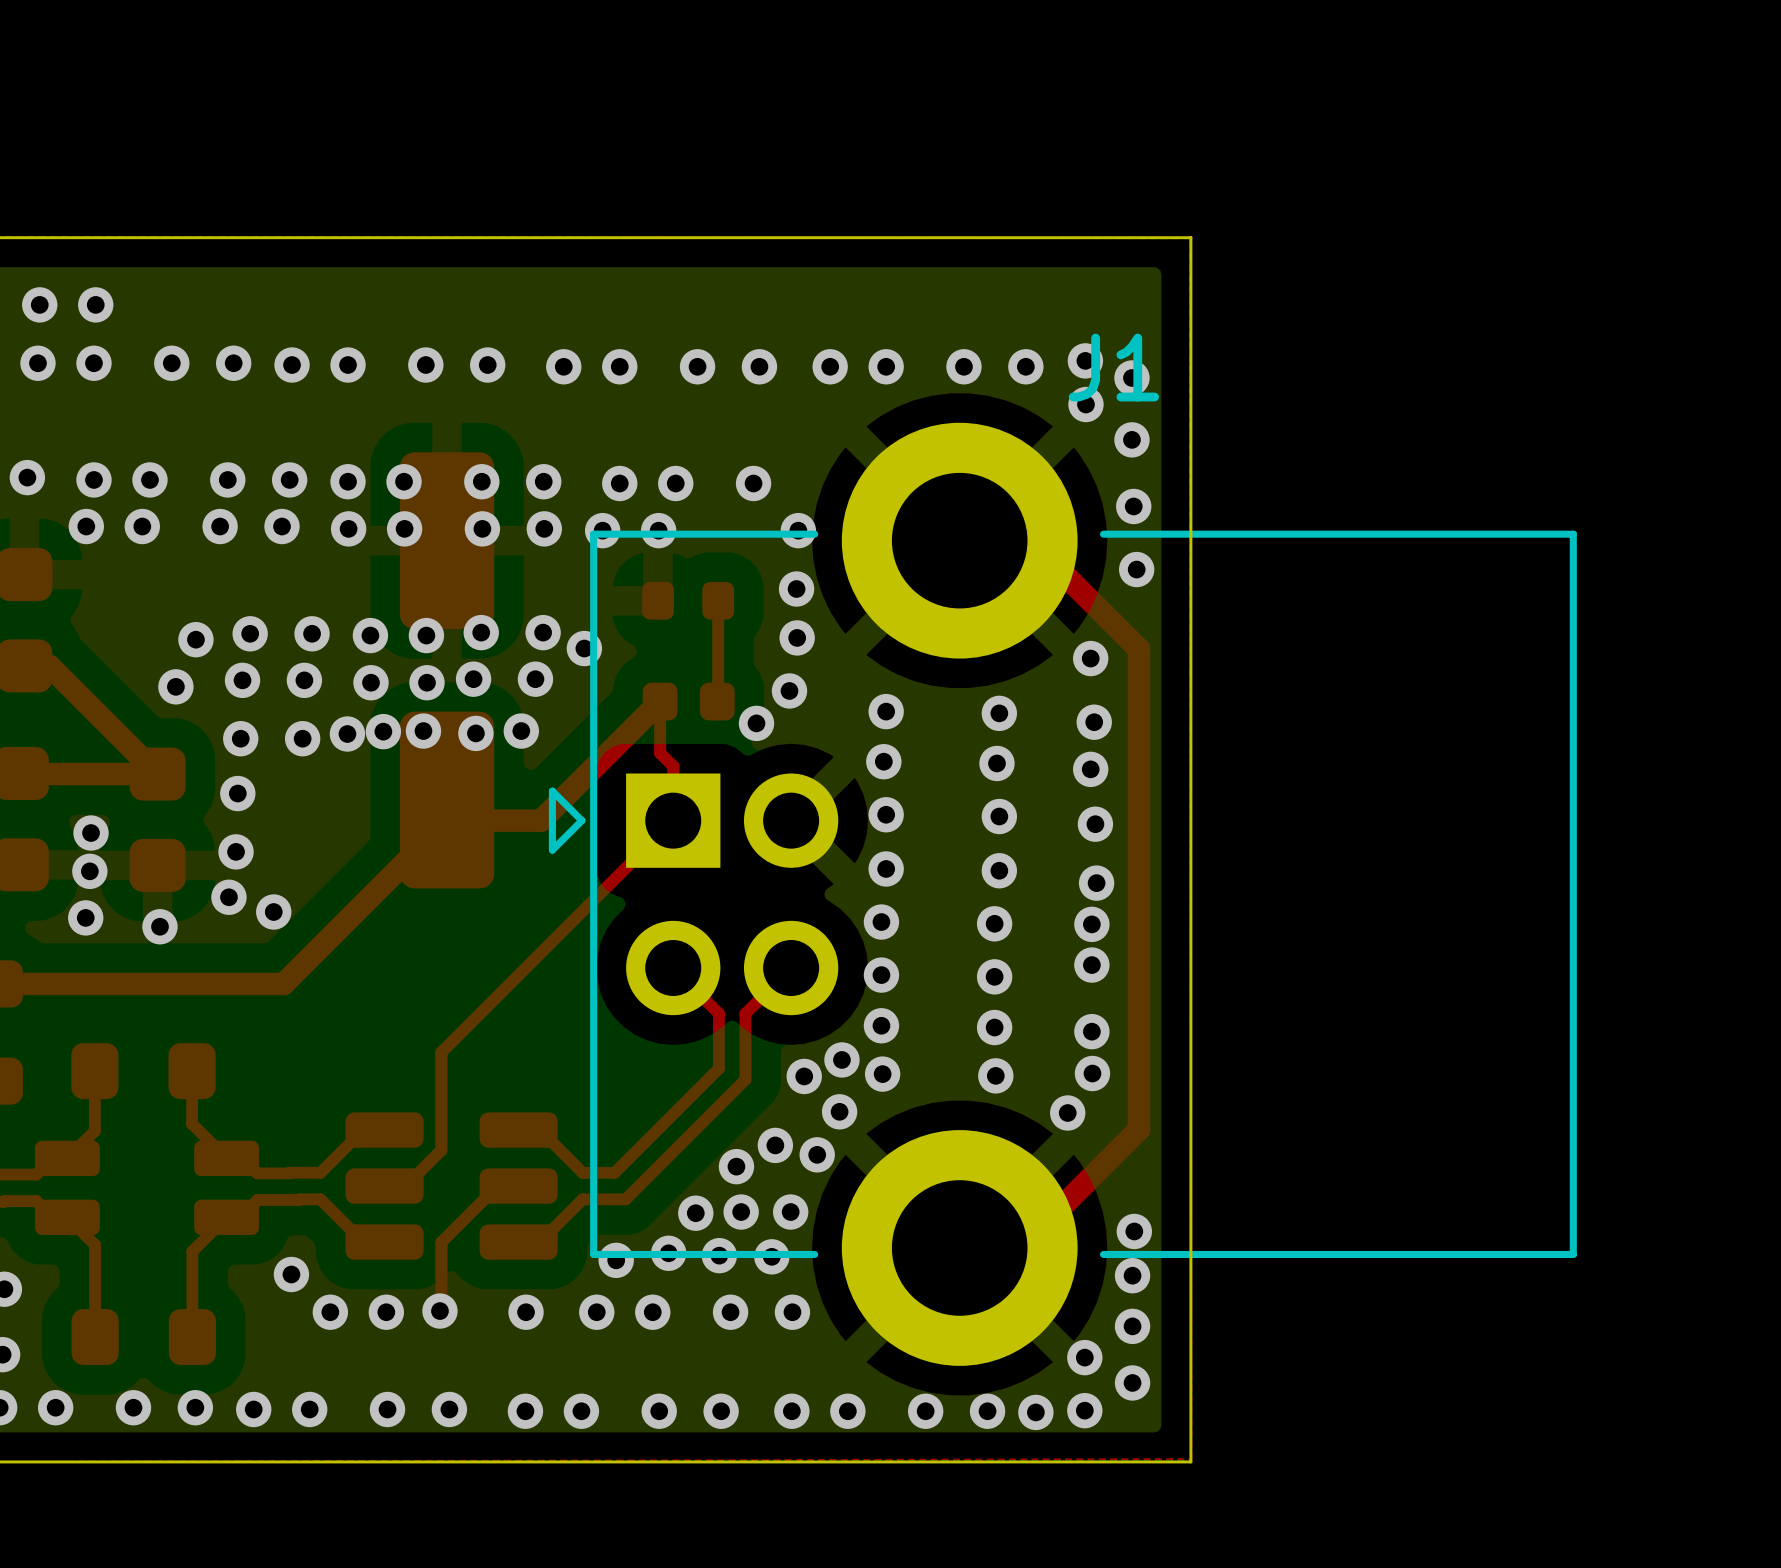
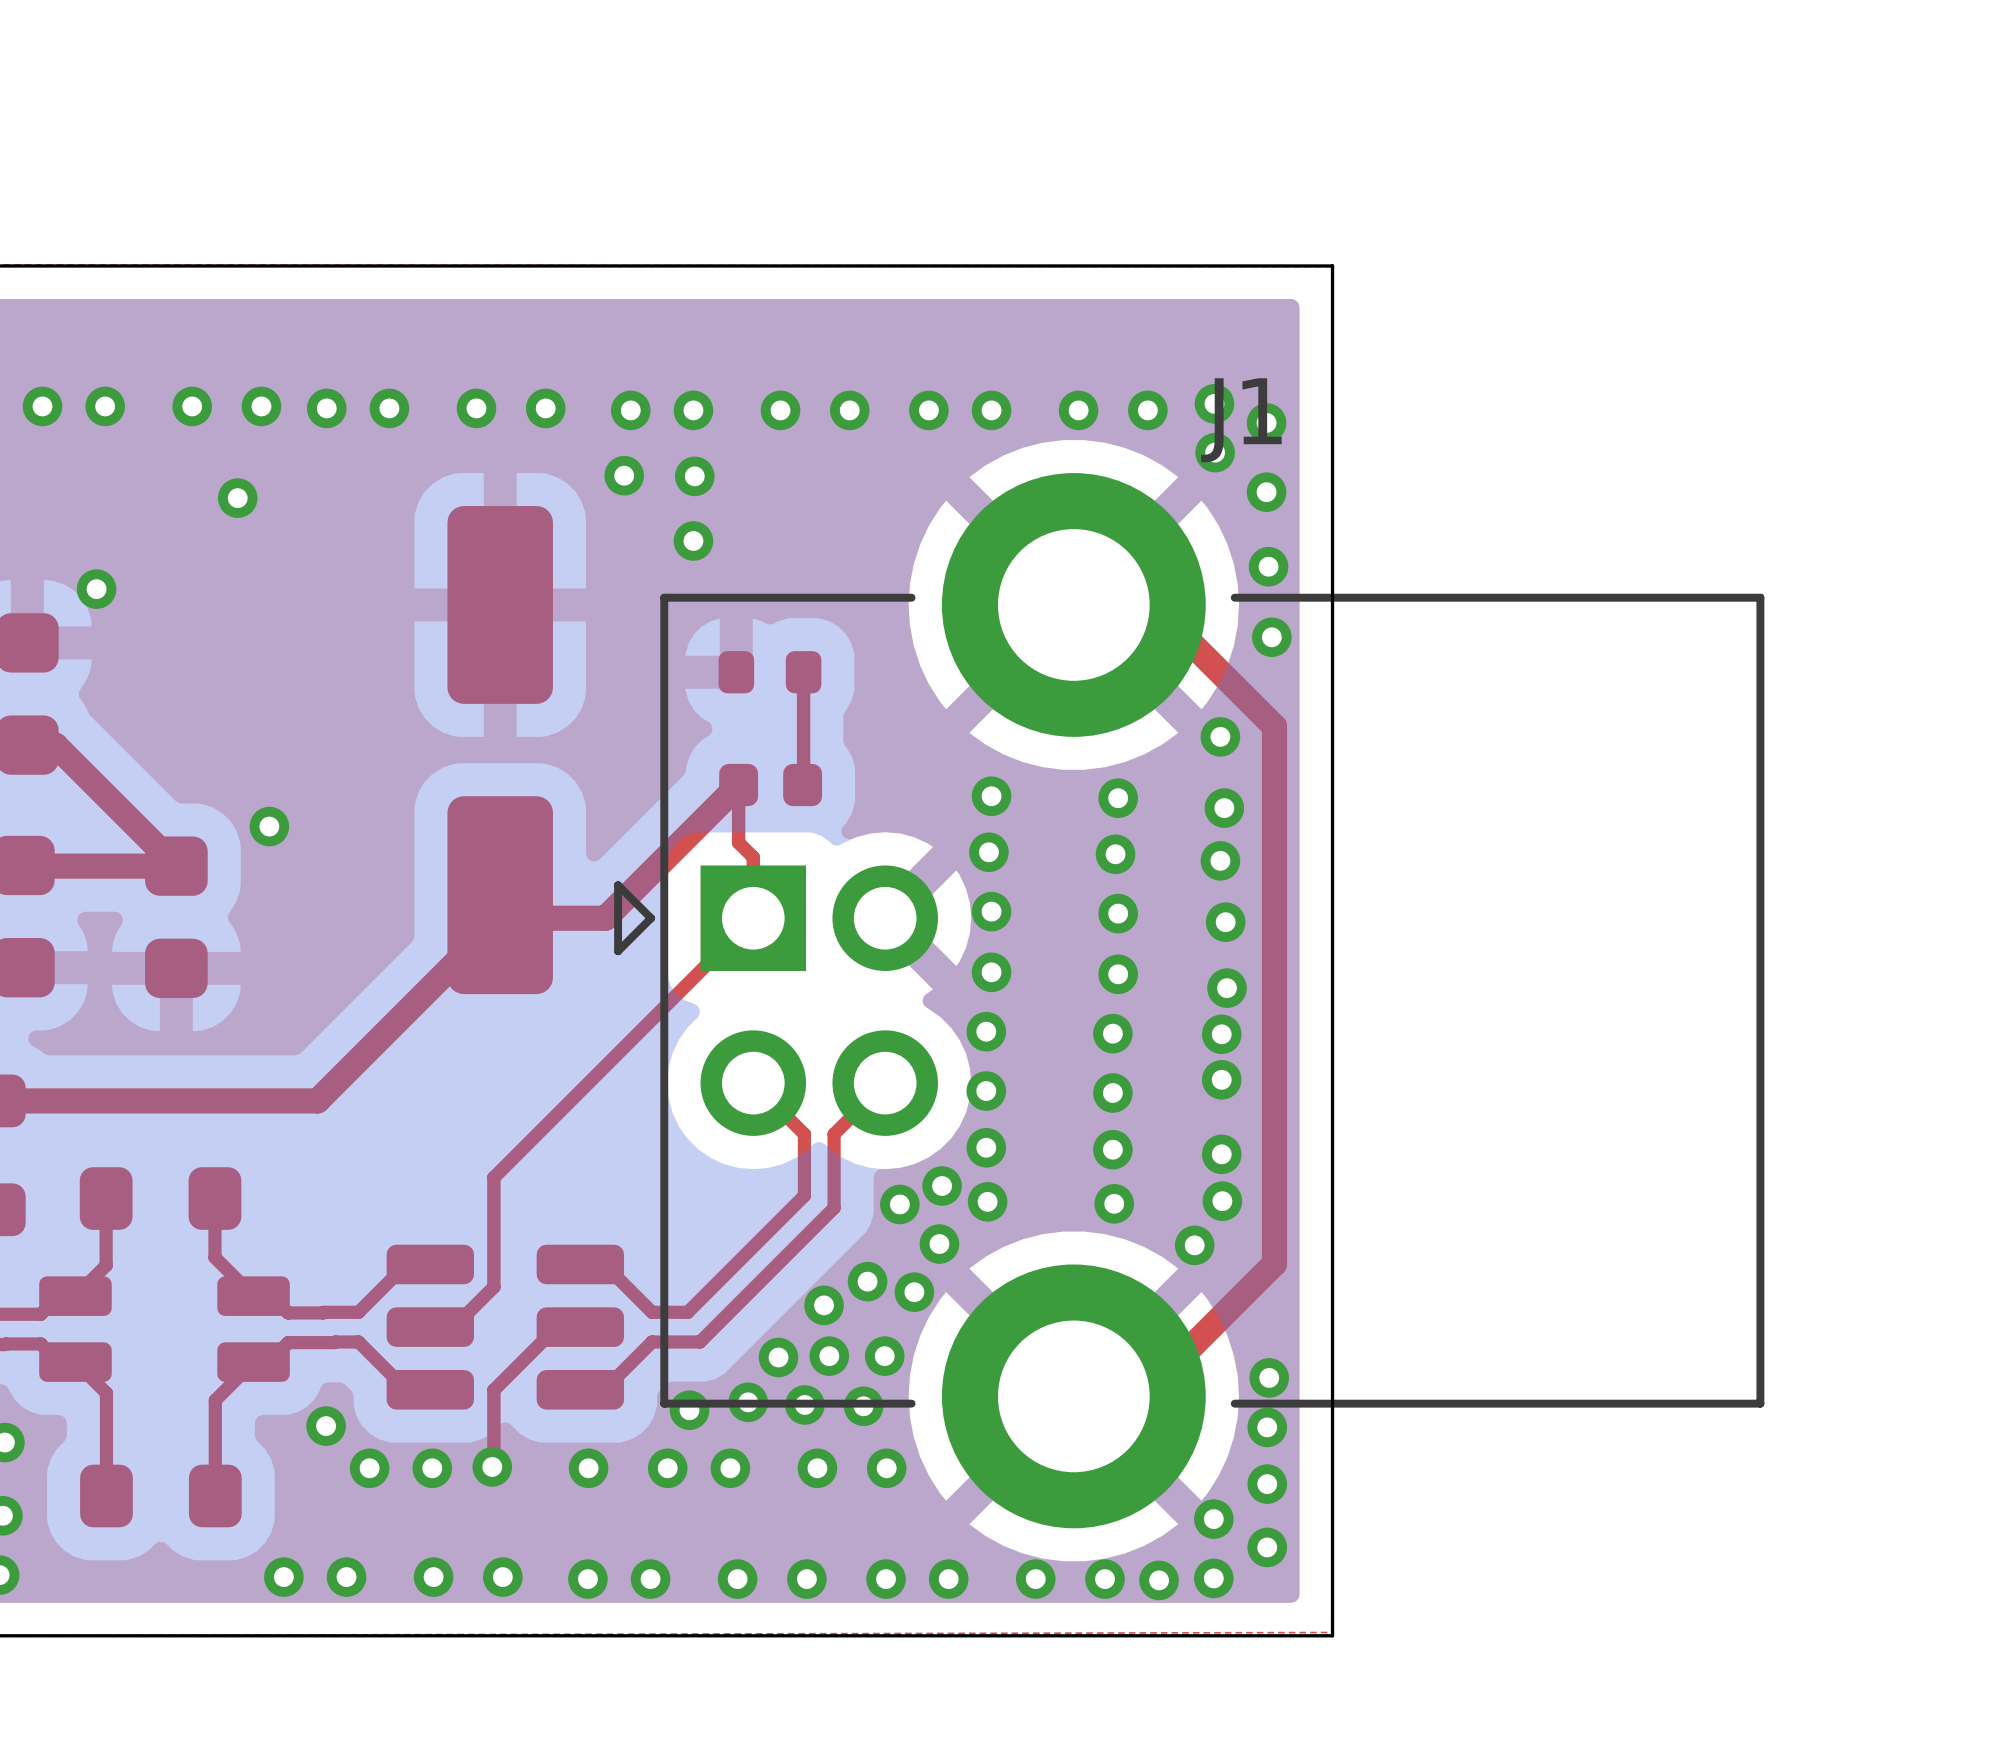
via: (39, 304) -> none
via: (95, 304) -> none
via: none -> (624, 475)
via: none -> (694, 476)
via: (27, 477) -> none
via: (93, 479) -> none
via: (149, 479) -> none
via position: (227, 479) -> (237, 498)
via: (289, 479) -> none
via: (348, 481) -> none
via: (404, 481) -> none
via: (481, 481) -> none
via: (543, 481) -> none
via: (675, 483) -> none
via: (753, 483) -> none
via: (142, 526) -> none
via: (220, 526) -> none
via: (282, 526) -> none
via: (348, 528) -> none
via: (404, 528) -> none
via: (482, 528) -> none
via: (544, 528) -> none
via: (602, 530) -> none
via: (658, 530) -> none
via: (798, 530) -> none
via: (796, 589) -> none
via: (481, 632) -> none
via: (543, 632) -> none
via: (250, 633) -> none
via: (312, 633) -> none
via: (370, 635) -> none
via: (426, 635) -> none
via: (797, 637) -> none
via: (195, 639) -> none
via: (584, 648) -> none
via: (473, 679) -> none
via: (535, 679) -> none
via: (242, 680) -> none
via: (304, 680) -> none
via: (371, 682) -> none
via: (427, 682) -> none
via: (175, 686) -> none
via: (789, 690) -> none
via: (756, 723) -> none
via: (383, 731) -> none
via: (423, 731) -> none
via: (521, 731) -> none
via: (475, 733) -> none
via: (347, 734) -> none
via: (302, 738) -> none
via: (237, 793) -> none
via: (91, 833) -> none
via: (236, 851) -> none
via: (89, 871) -> none
via: (228, 897) -> none
via: (273, 912) -> none
via: (85, 917) -> none
via: (159, 926) -> none
via: (55, 1407) -> none
via: (133, 1407) -> none
via: (195, 1407) -> none

